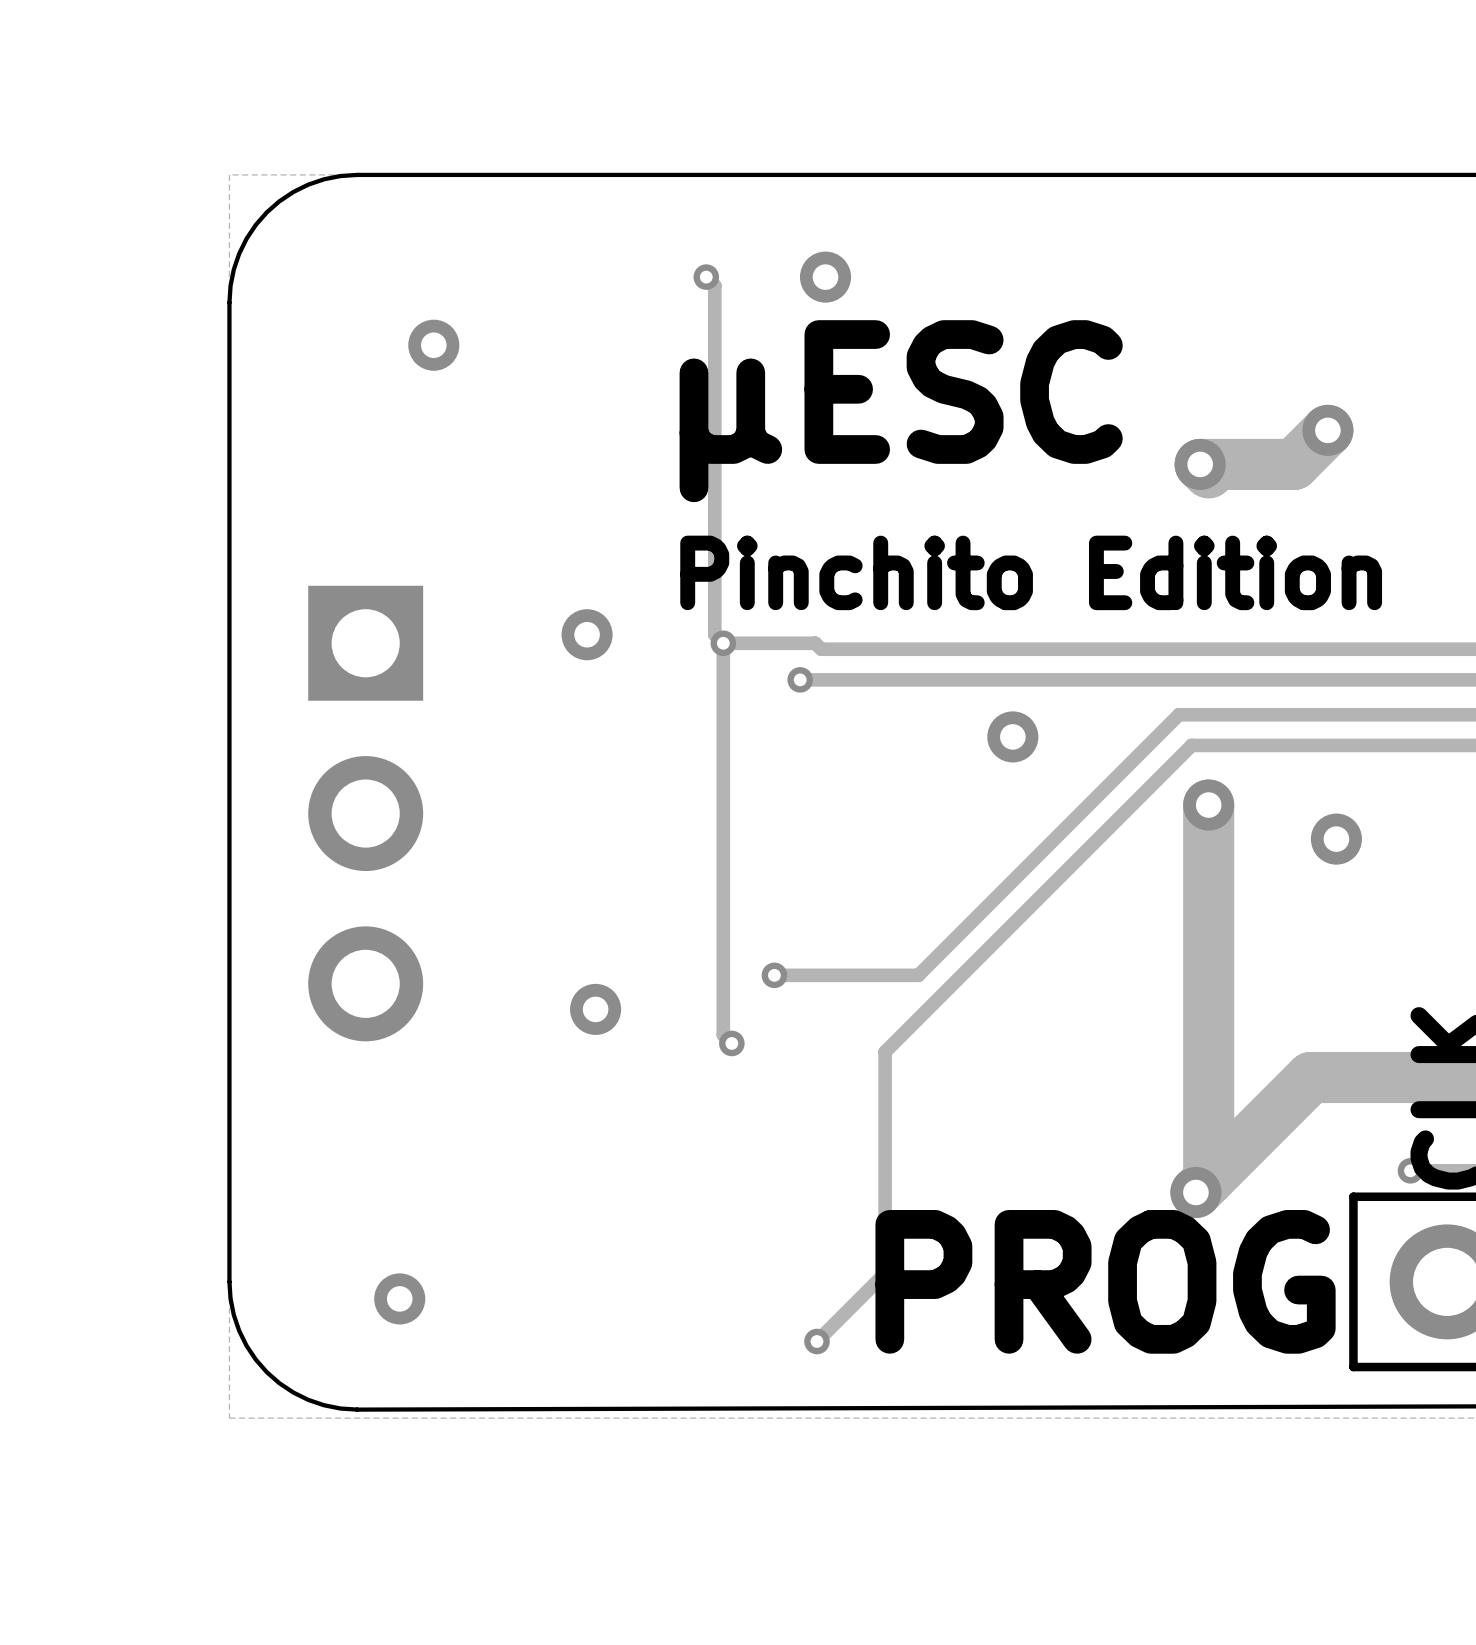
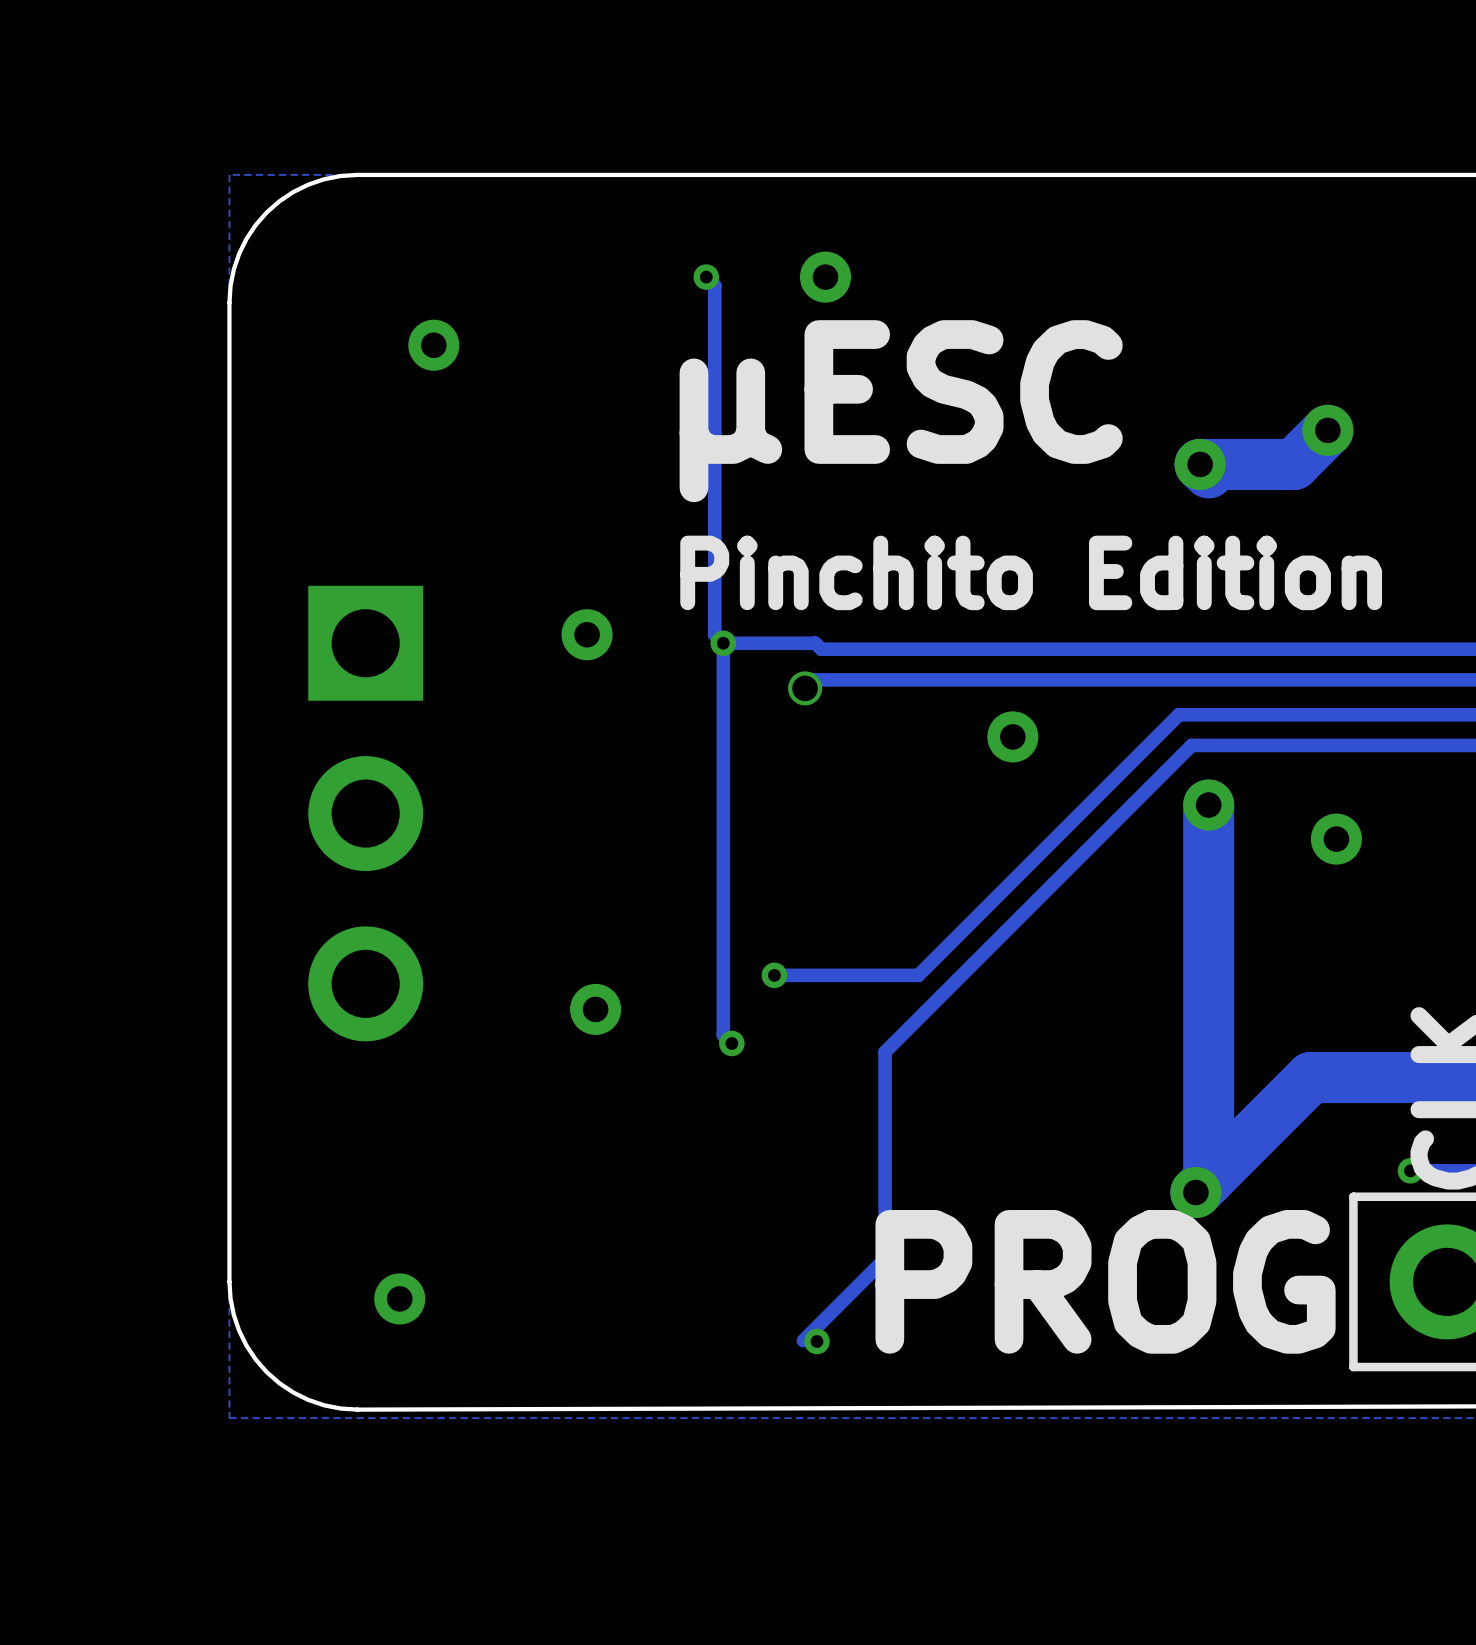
via size: [787, 667, 813, 693] -> [788, 671, 823, 706]
track: (885, 1258) (885, 1273) (816, 1341) -> (885, 1258) (803, 1340)

